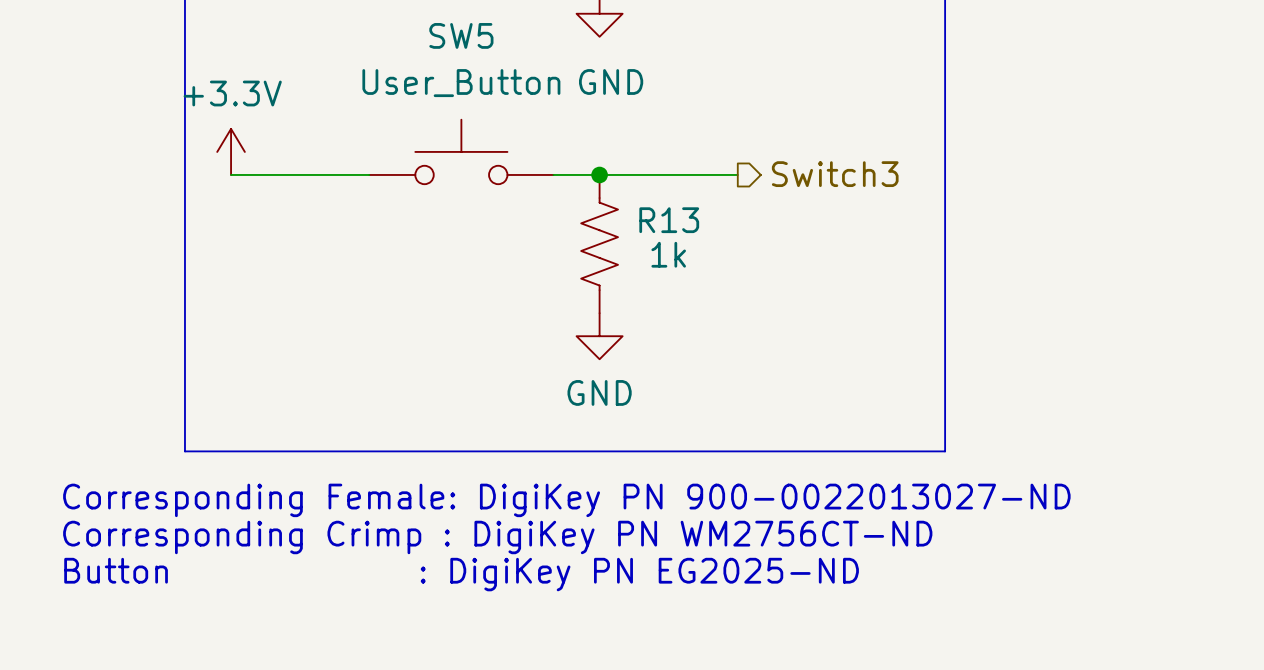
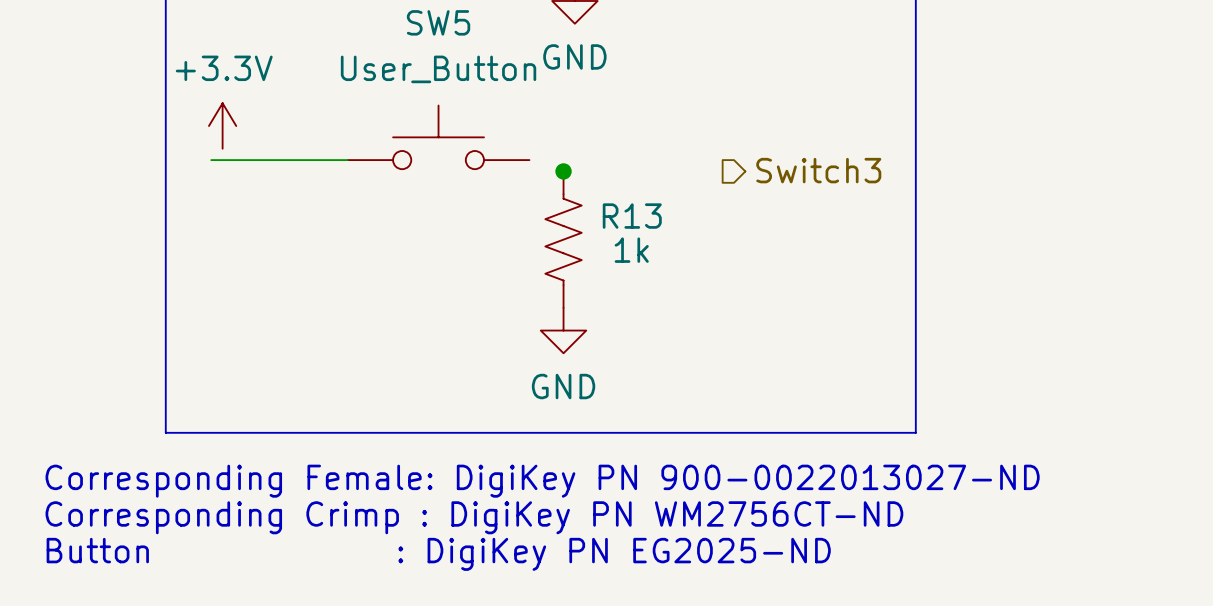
power symbol text position: GND (611, 81) -> GND (574, 56)
power symbol position: +3.3V (231, 151) -> +3.3V (222, 125)
wire: (553, 174) (737, 174) -> none
junction position: (599, 174) -> (563, 171)
hierarchical label position: Switch3 (835, 174) -> Switch3 (818, 170)
R13 position: (599, 244) -> (563, 239)
power symbol position: GND (599, 336) -> GND (563, 330)

